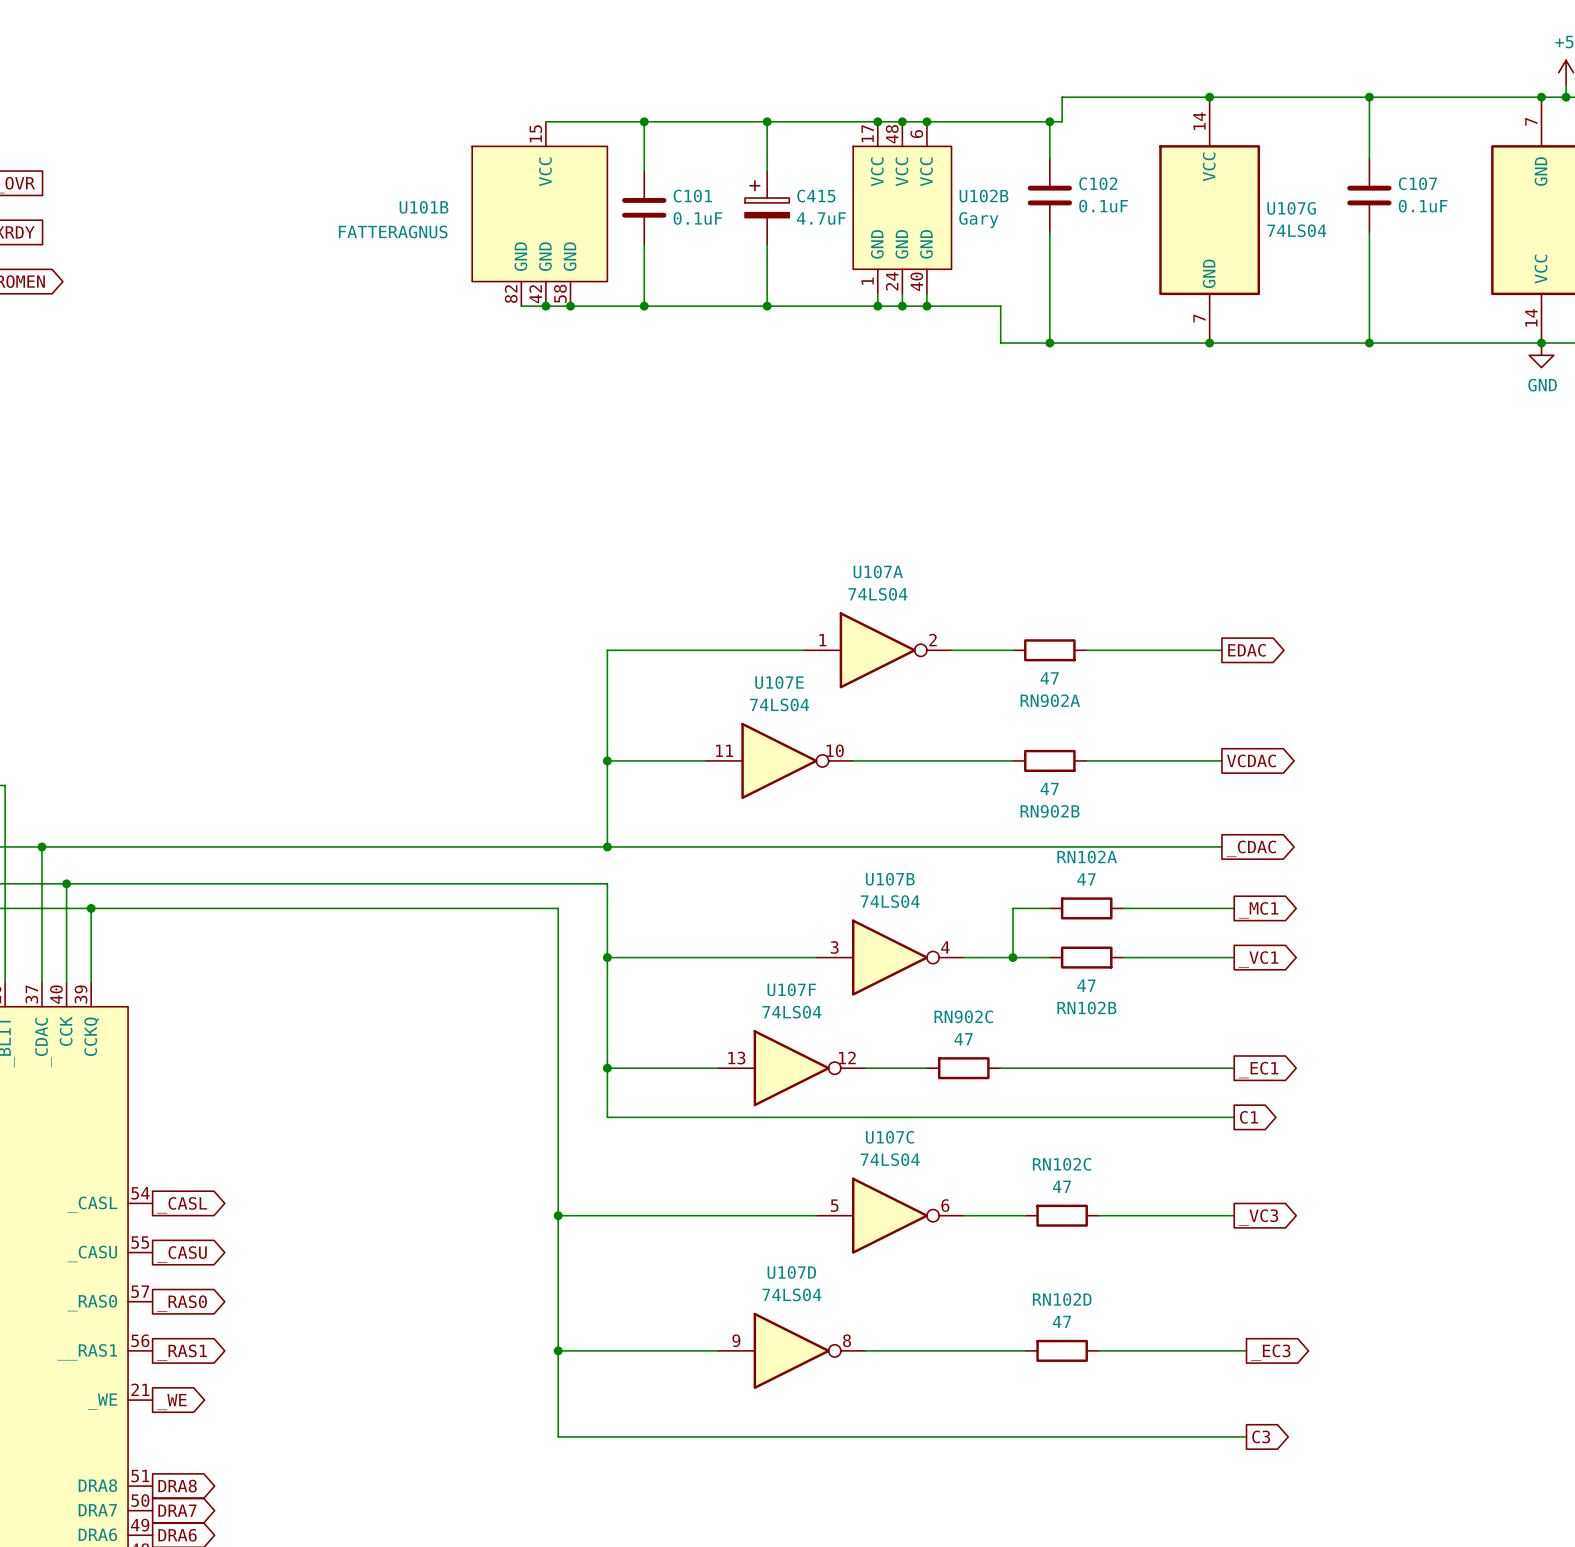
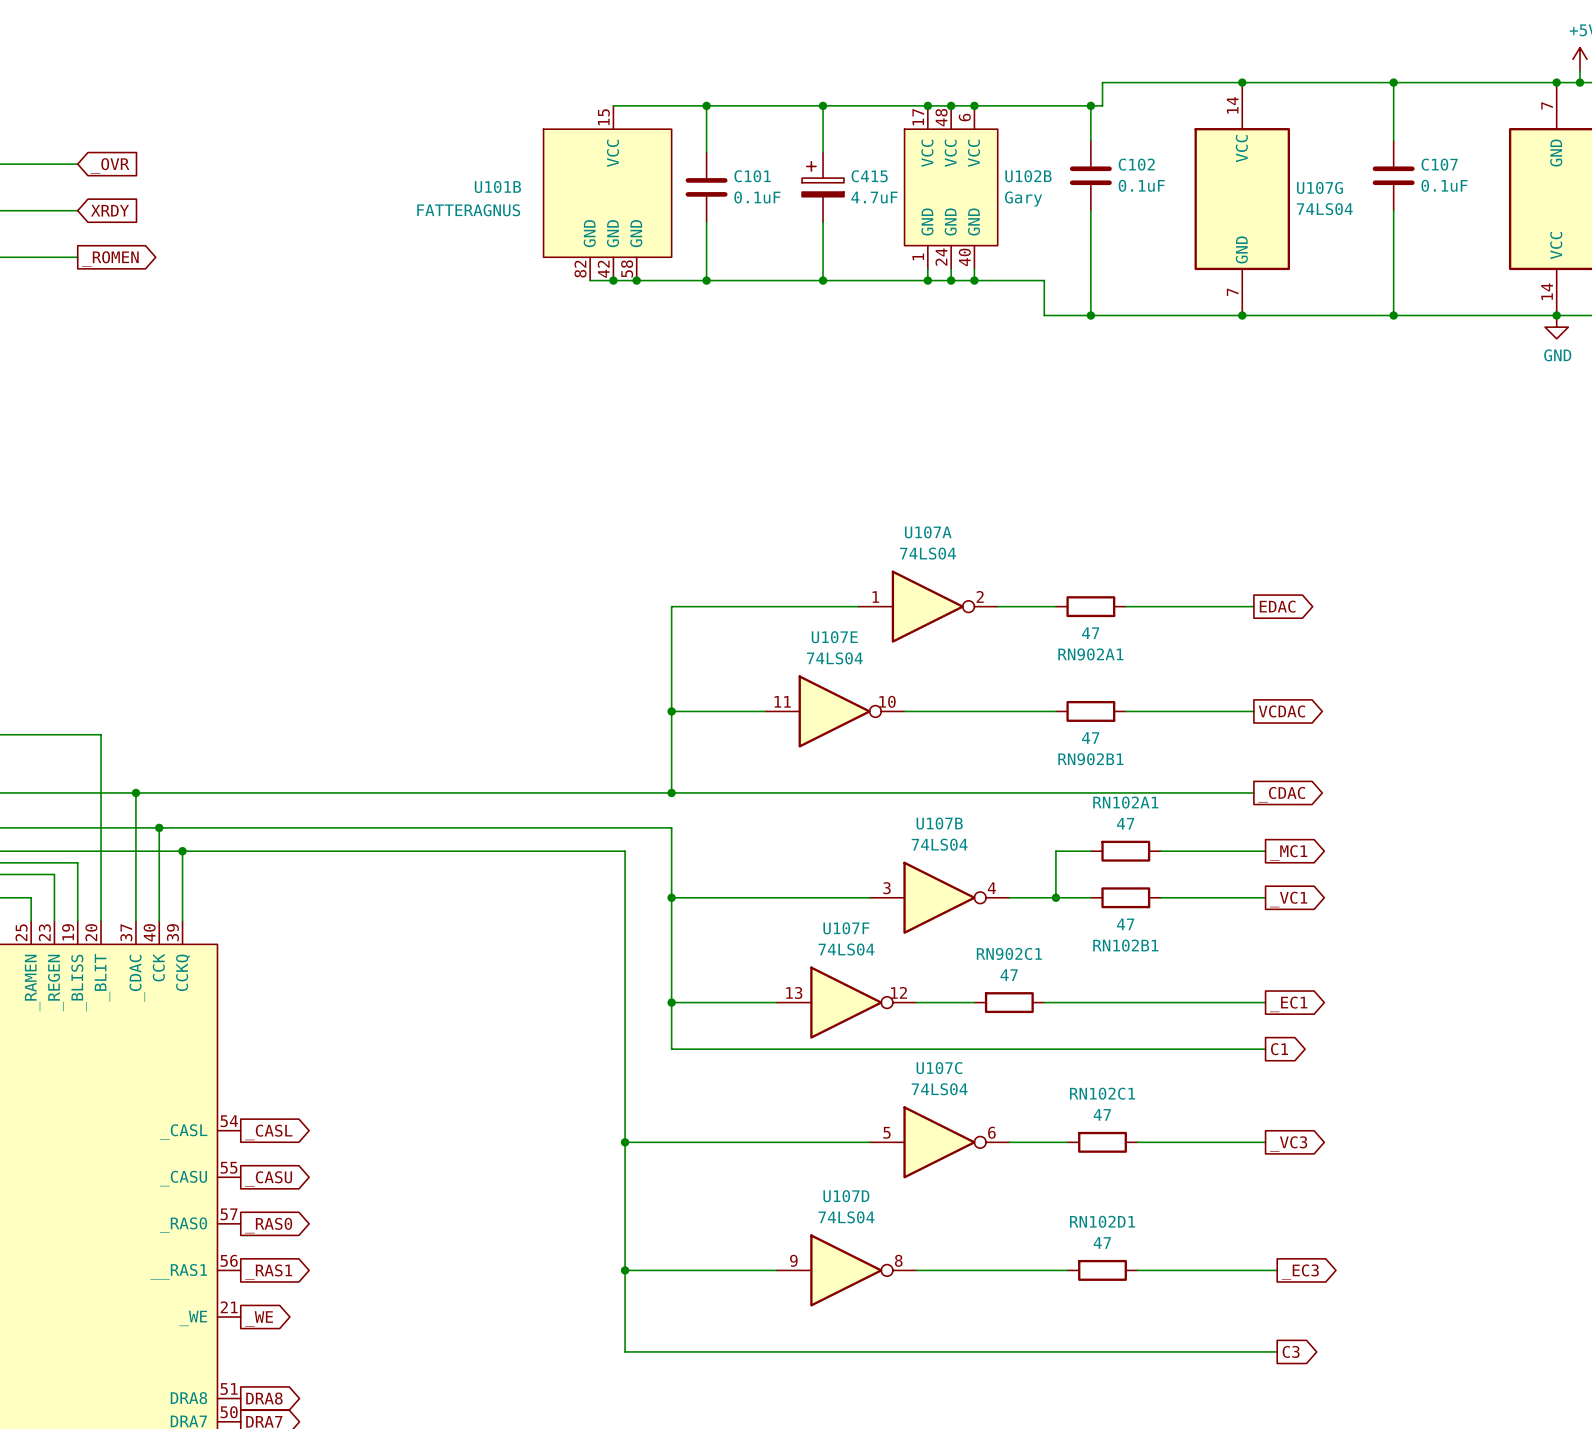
RN902A name: RN902A (1050, 700) -> RN902A1 (1090, 654)
RN902B name: RN902B (1050, 811) -> RN902B1 (1090, 759)
RN102A name: RN102A (1087, 857) -> RN102A1 (1125, 802)
RN102B name: RN102B (1086, 1008) -> RN102B1 (1125, 945)
RN902C name: RN902C (963, 1016) -> RN902C1 (1009, 953)
RN102C name: RN102C (1062, 1164) -> RN102C1 (1102, 1093)
RN102D name: RN102D (1062, 1299) -> RN102D1 (1102, 1221)

